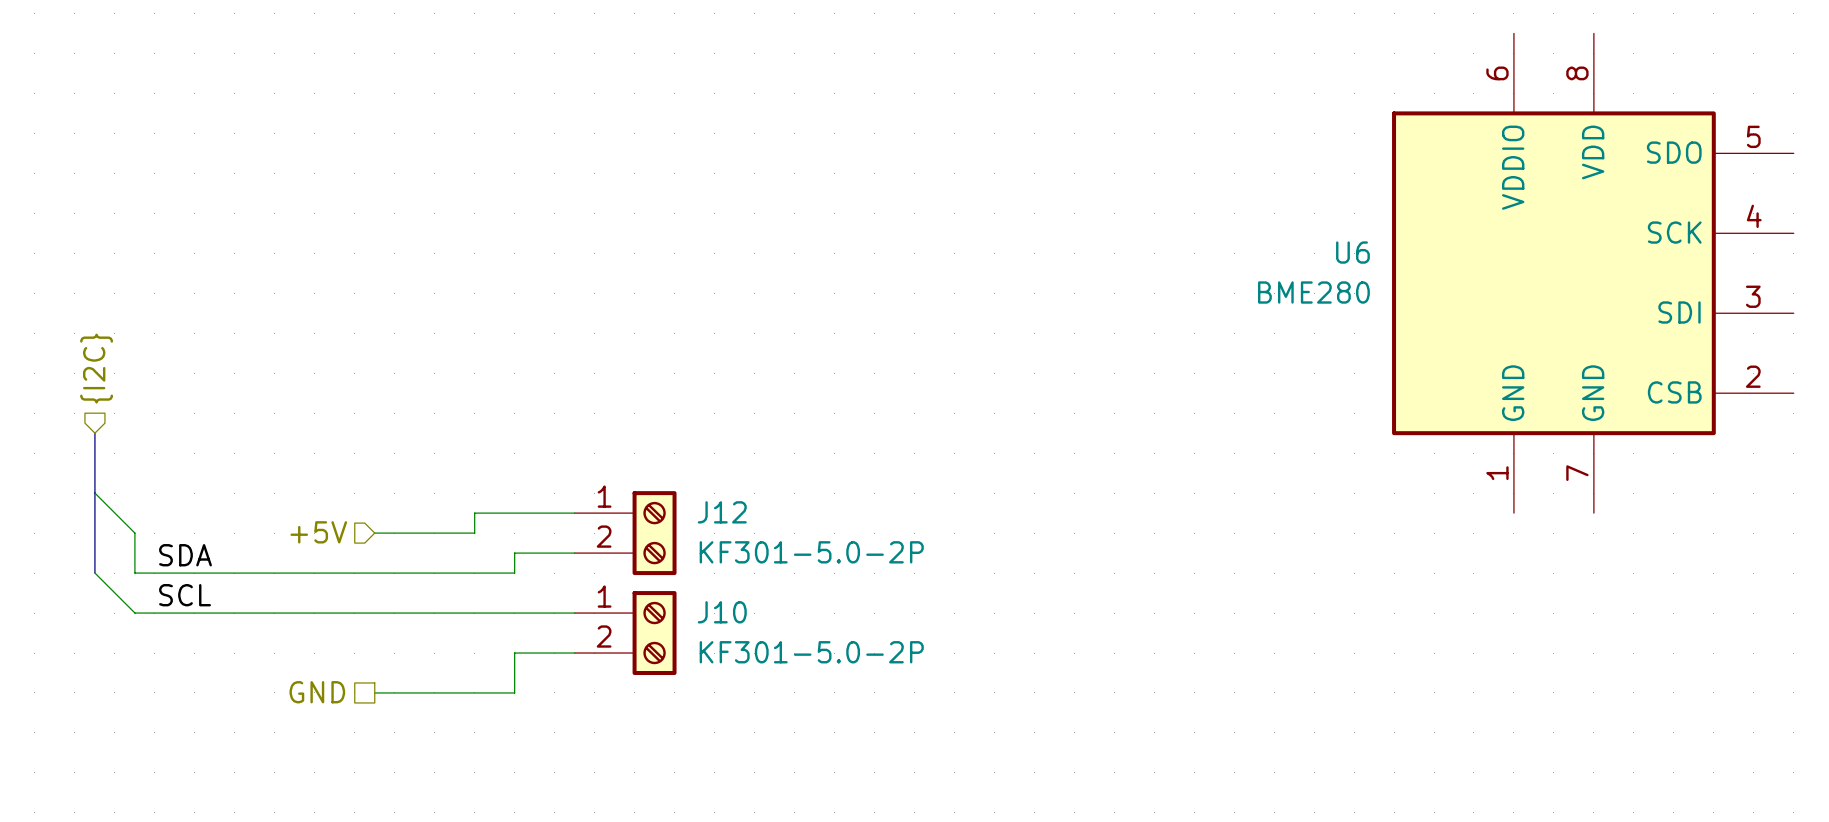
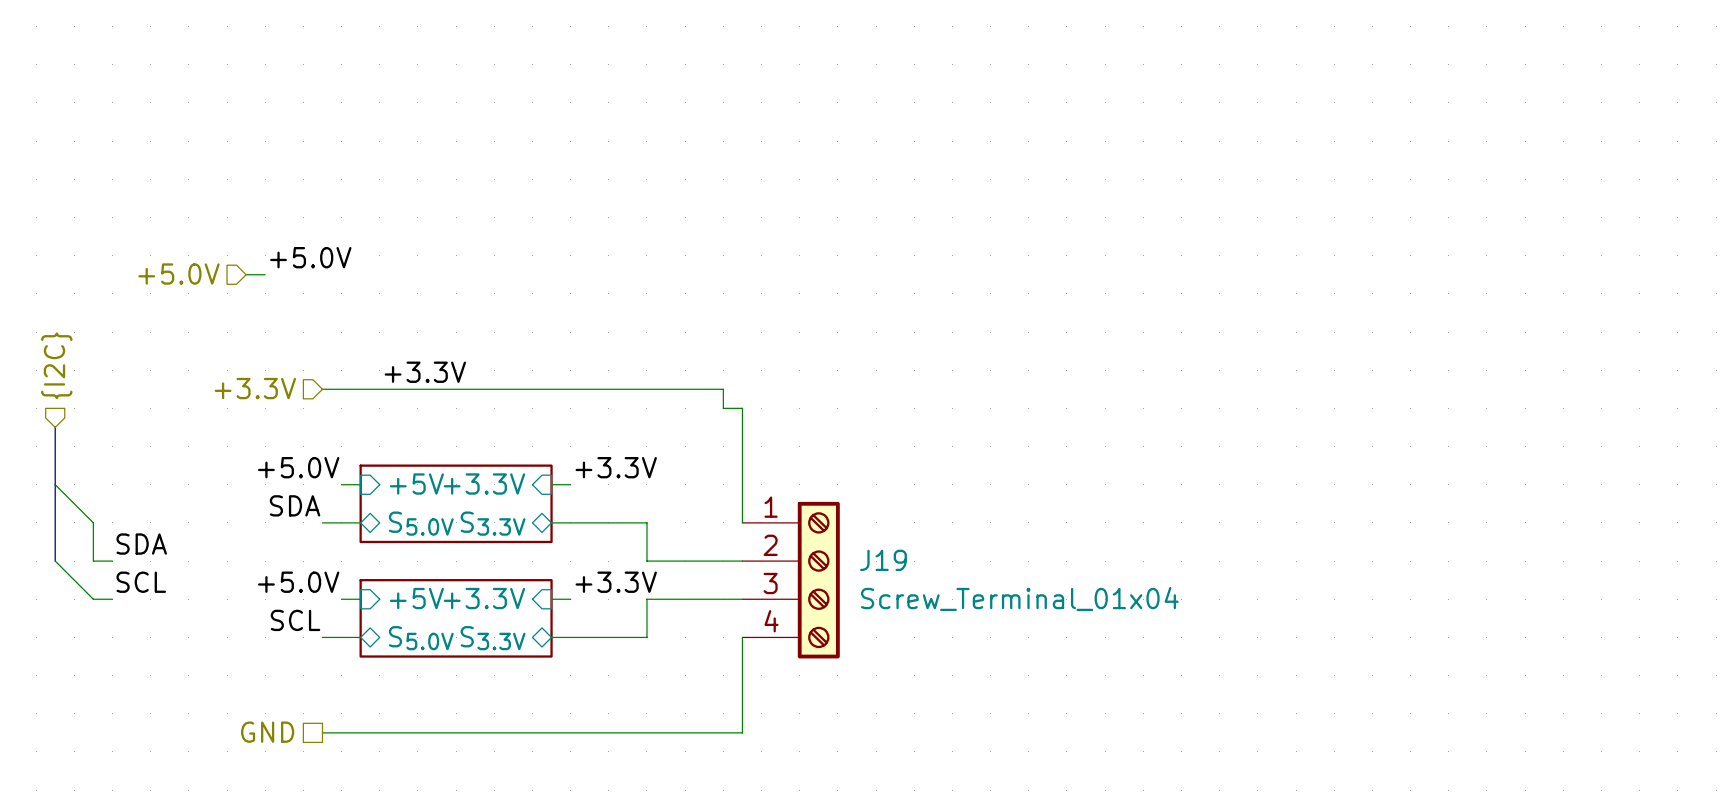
label: none -> +5.0V (310, 257)
hierarchical label: none -> +5.0V (179, 274)
wire: none -> (246, 274) (265, 274)
U6: BME280 (1592, 273) -> none
label: none -> +3.3V (425, 372)
hierarchical label: none -> +3.3V (255, 388)
wire: none -> (322, 389) (723, 389) (723, 408) (742, 408) (742, 522)
label: none -> +5.0V (298, 467)
label: none -> +3.3V (616, 467)
sheet pin: none -> +5V (416, 484)
sheet pin: none -> +3.3V (484, 484)
wire: none -> (341, 484) (360, 484)
wire: none -> (551, 484) (570, 484)
sheet: none -> (456, 503)
wire: (574, 513) (474, 513) (474, 533) (414, 533) -> none
label: none -> SDA (295, 505)
hierarchical label: +5V (318, 532) -> none
sheet pin: none -> S5.0V (421, 523)
sheet pin: none -> S3.3V (493, 523)
wire: none -> (551, 522) (646, 522) (646, 561) (742, 561)
J12: KF301-5.0-2P (625, 533) -> none
wire: (574, 553) (514, 553) (514, 573) (154, 573) -> none
J19: none -> Screw_Terminal_01x04 (791, 580)
label: none -> +5.0V (298, 582)
label: none -> +3.3V (616, 582)
sheet pin: none -> +5V (416, 598)
sheet pin: none -> +3.3V (484, 598)
wire: (154, 613) (394, 613) -> none
wire: (414, 613) (574, 613) -> none
wire: none -> (742, 599) (646, 599) (646, 637) (551, 637)
sheet: none -> (456, 618)
J10: KF301-5.0-2P (625, 633) -> none
label: none -> SCL (295, 620)
wire: none -> (322, 637) (360, 637)
sheet pin: none -> S5.0V (421, 638)
sheet pin: none -> S3.3V (493, 638)
wire: (574, 653) (514, 653) (514, 692) (374, 692) -> none
wire: none -> (742, 637) (742, 732) (322, 732)
hierarchical label position: GND (317, 692) -> GND (267, 732)

